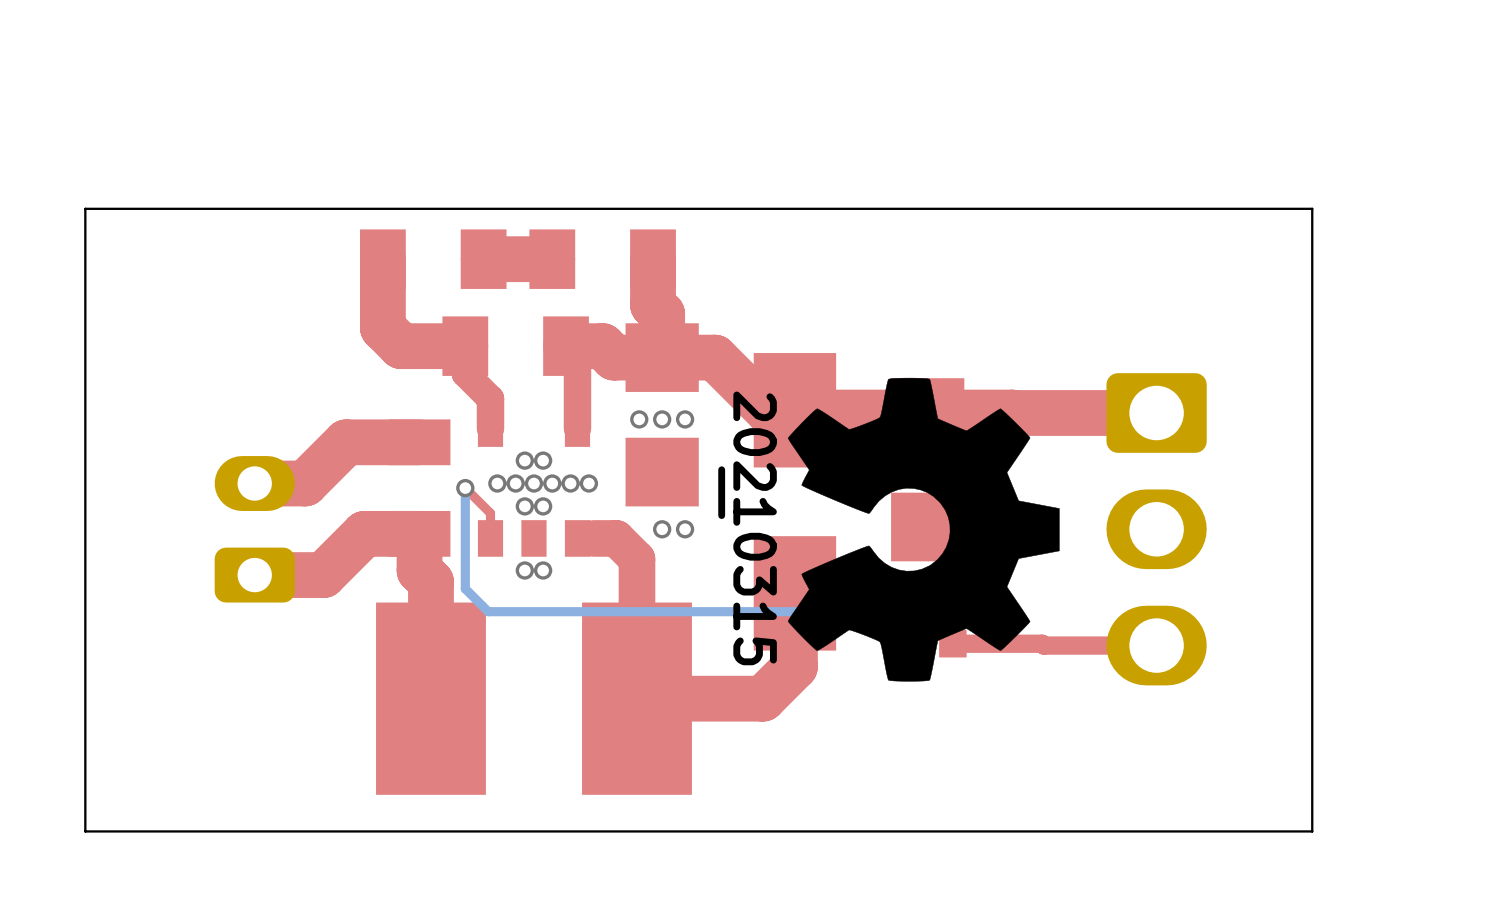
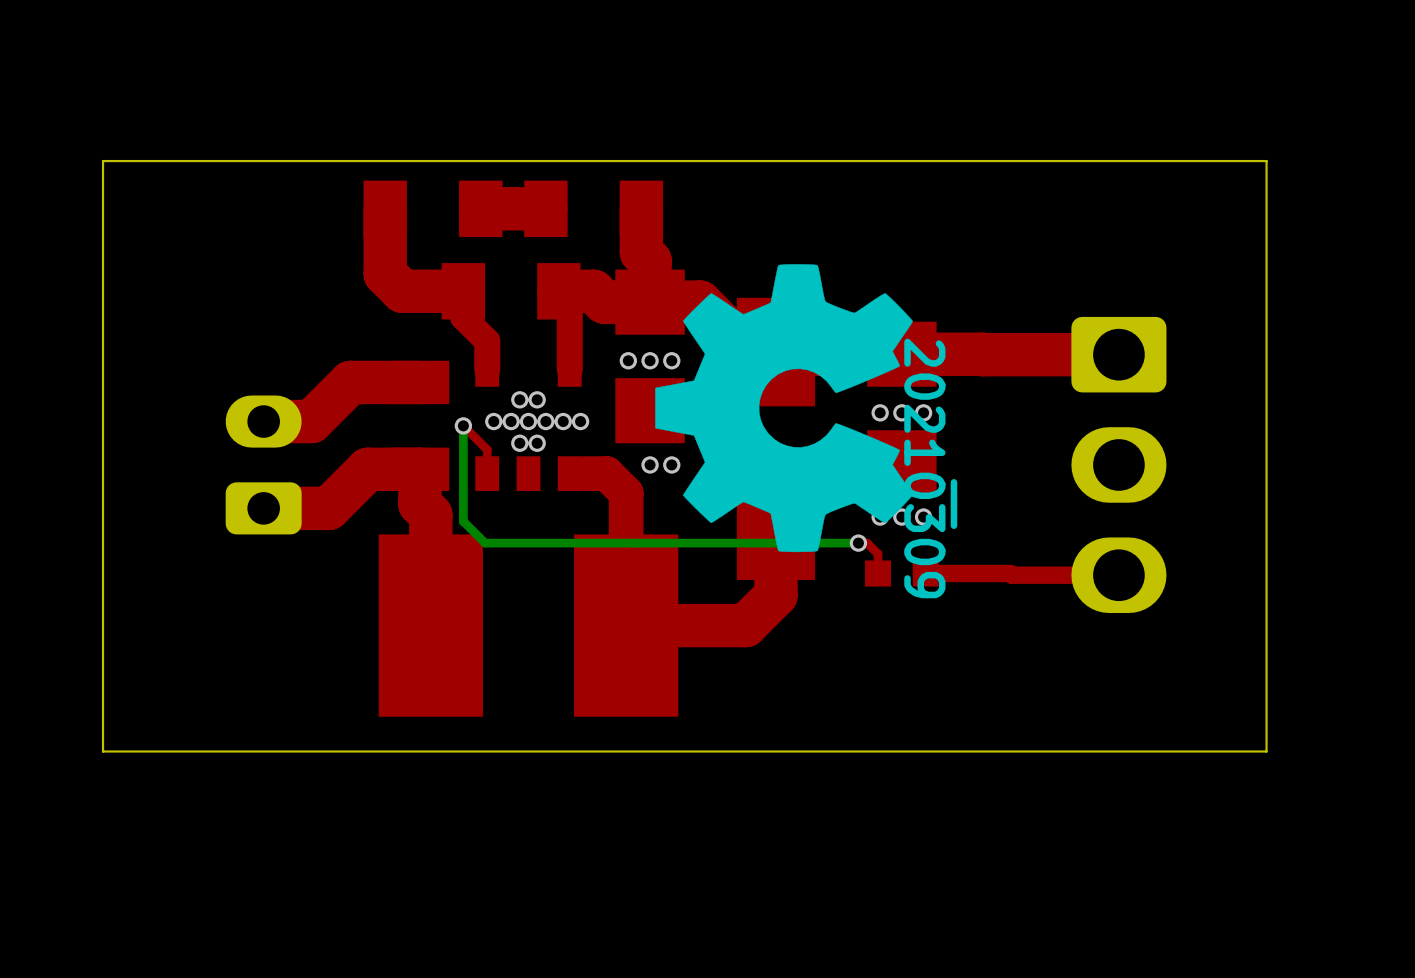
drawing: none -> [655, 264, 958, 553]
drawing: [718, 377, 1060, 682] -> none
via: (524, 570) -> none
via: (543, 570) -> none

